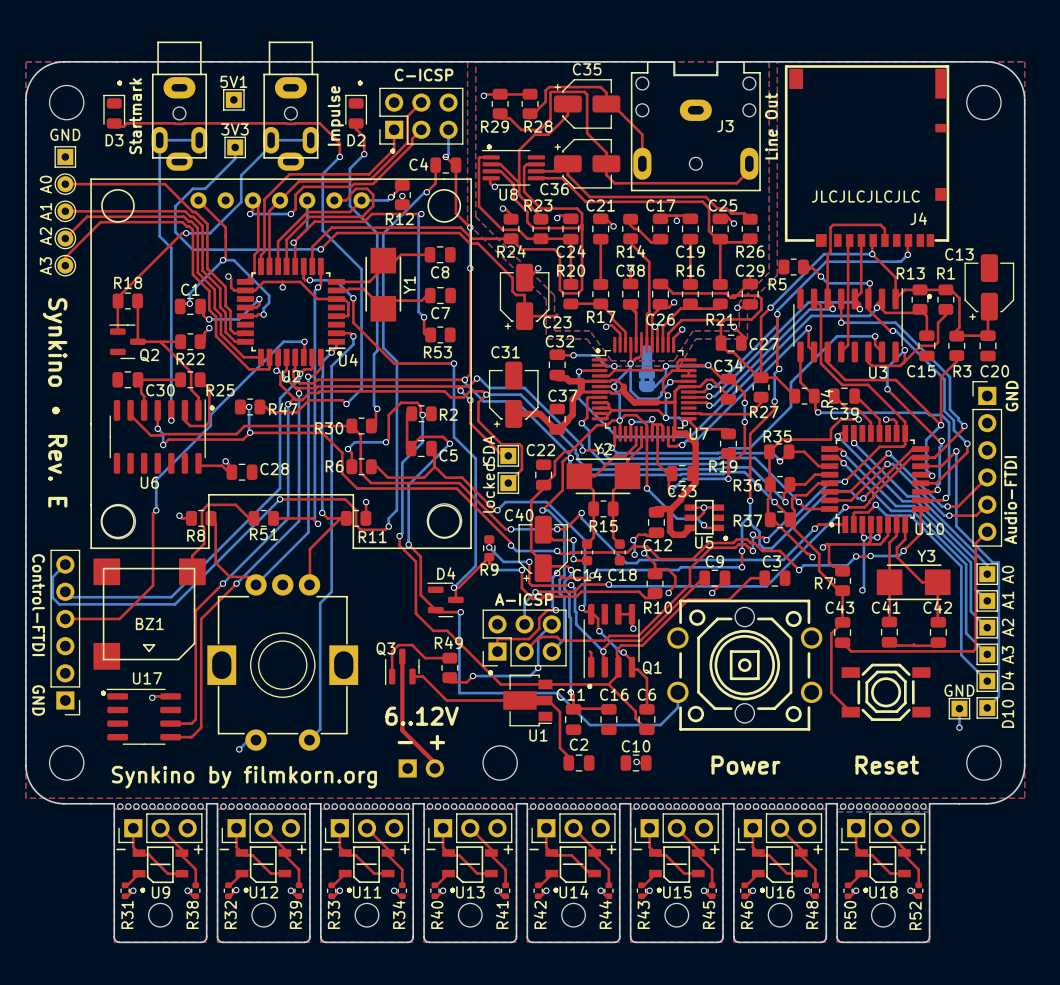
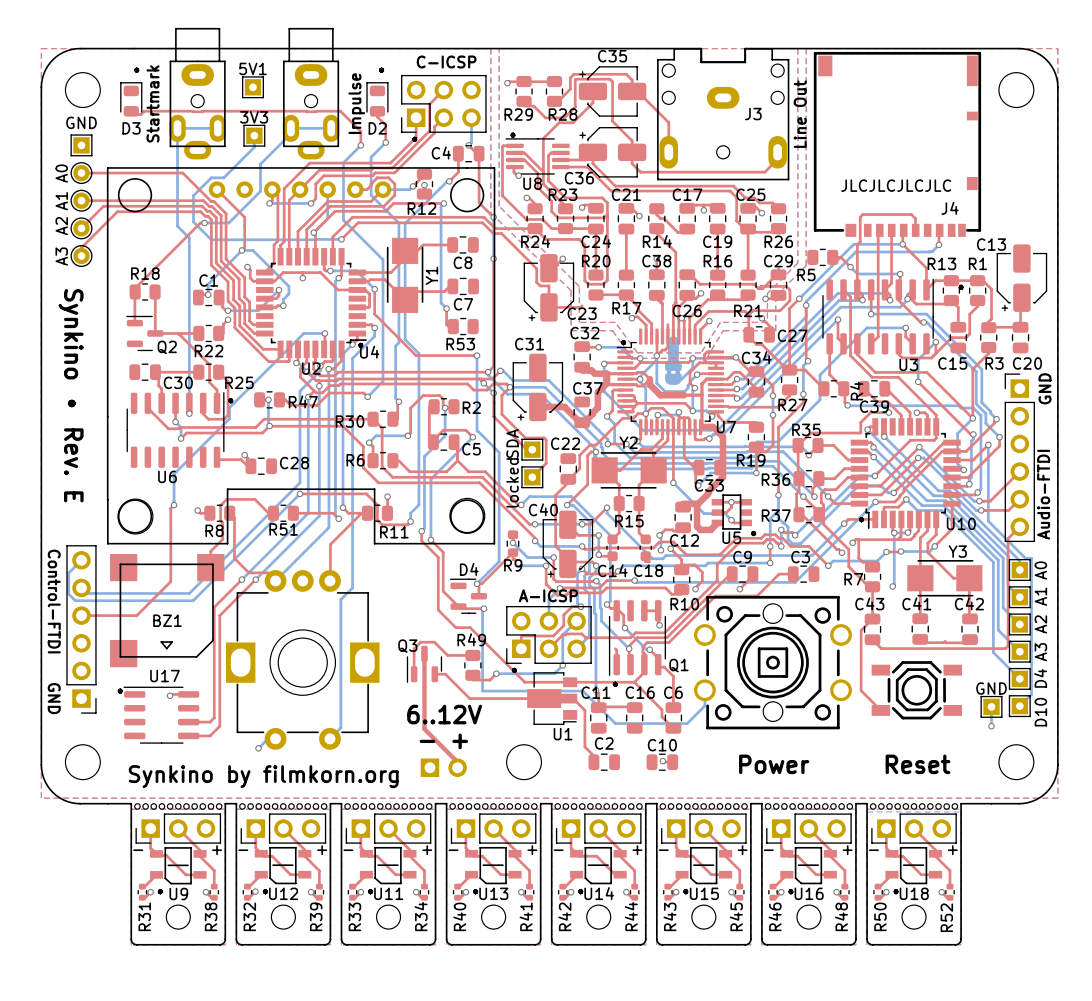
top track: none -> (645, 561) (649, 561)

